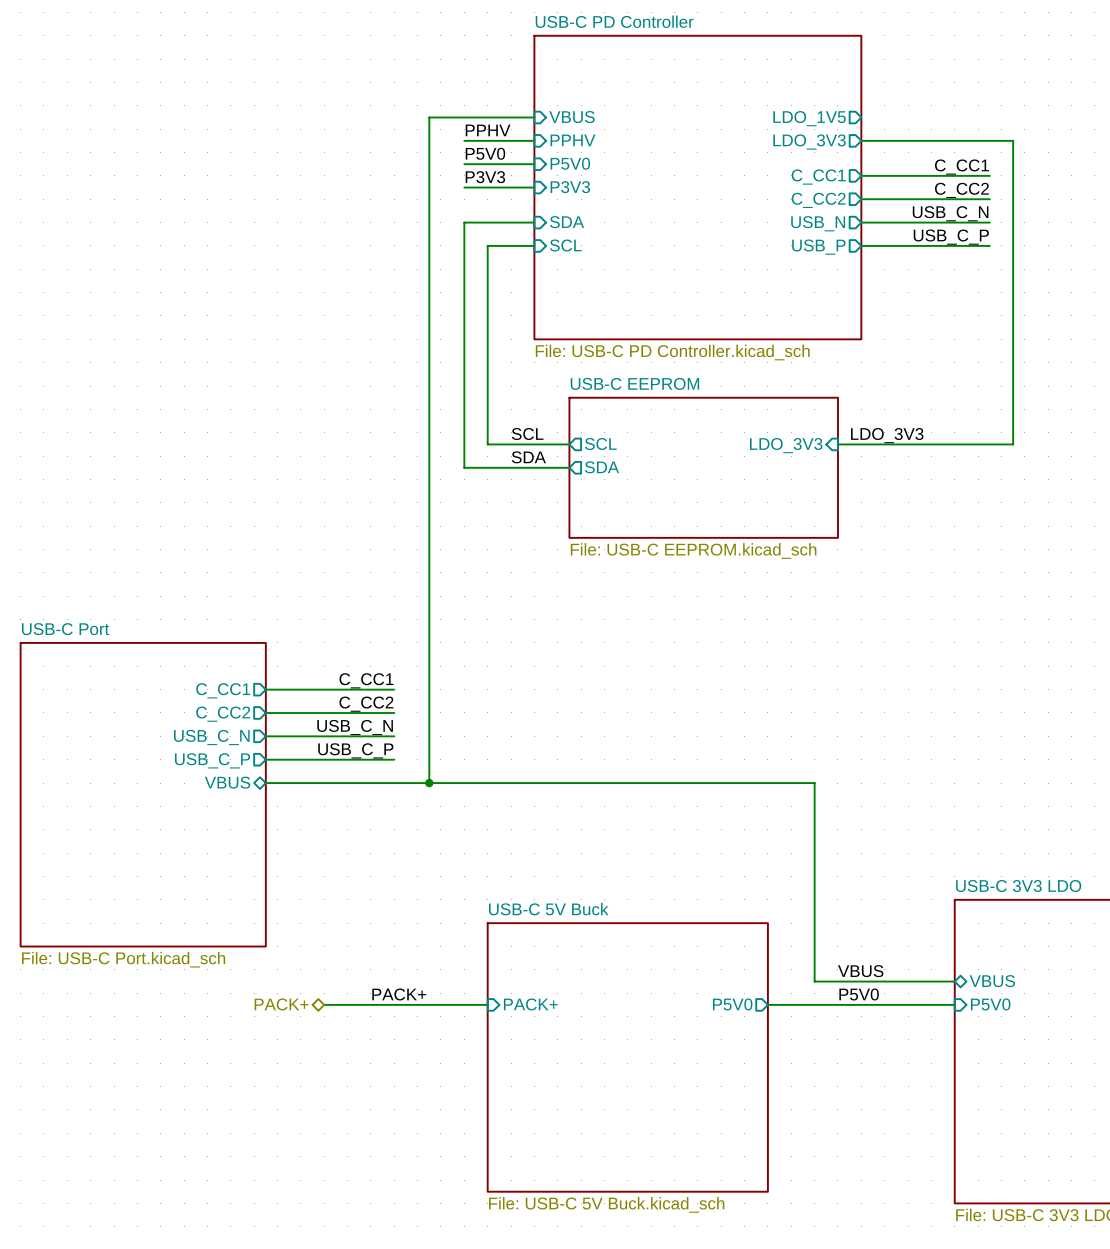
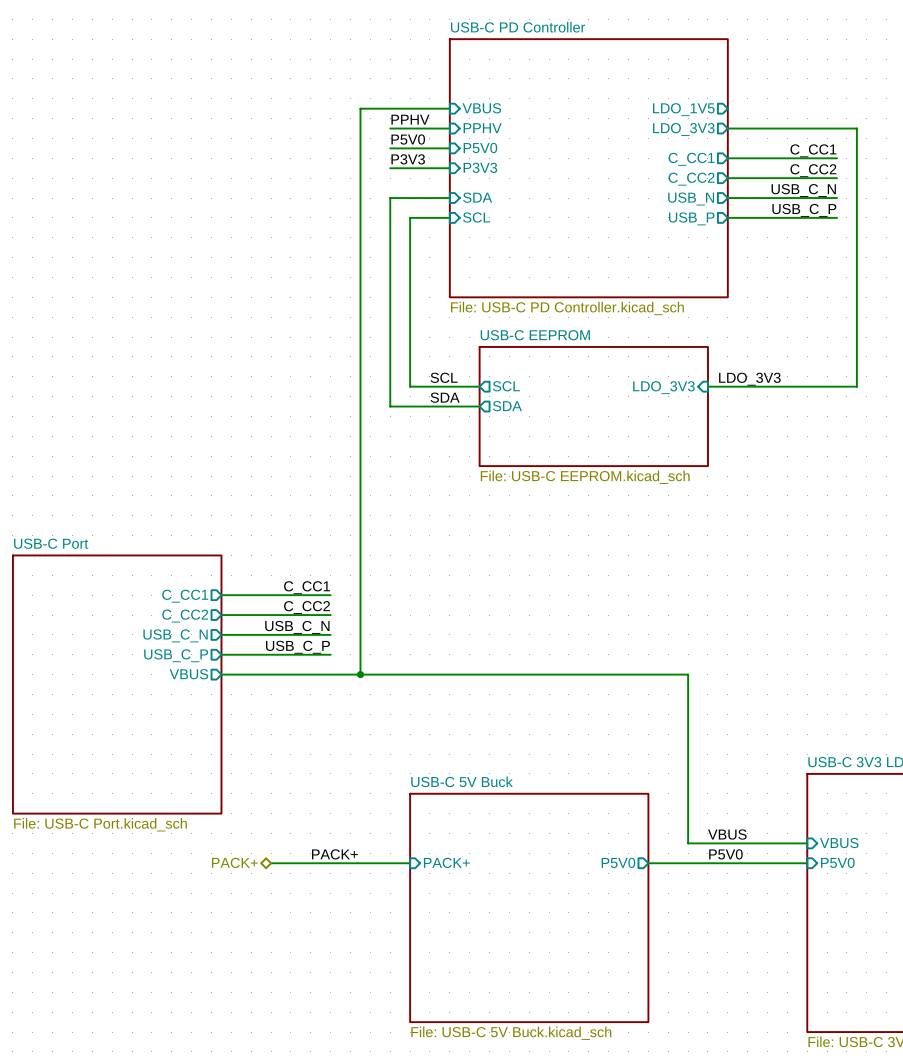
sheet pin shape: bidirectional (227, 782) -> output (188, 674)
sheet pin shape: bidirectional (992, 981) -> input (839, 843)

